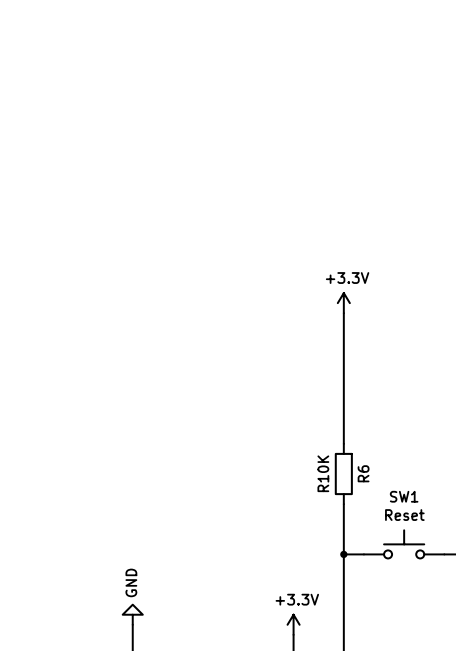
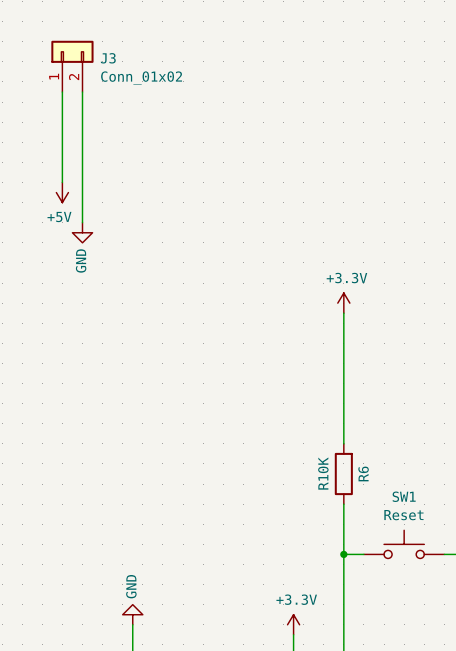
J3: none -> Conn_01x02 (72, 66)
wire: none -> (62, 92) (62, 182)
wire: none -> (82, 92) (82, 222)
power symbol: none -> +5V (62, 192)
power symbol: none -> GND (82, 232)

